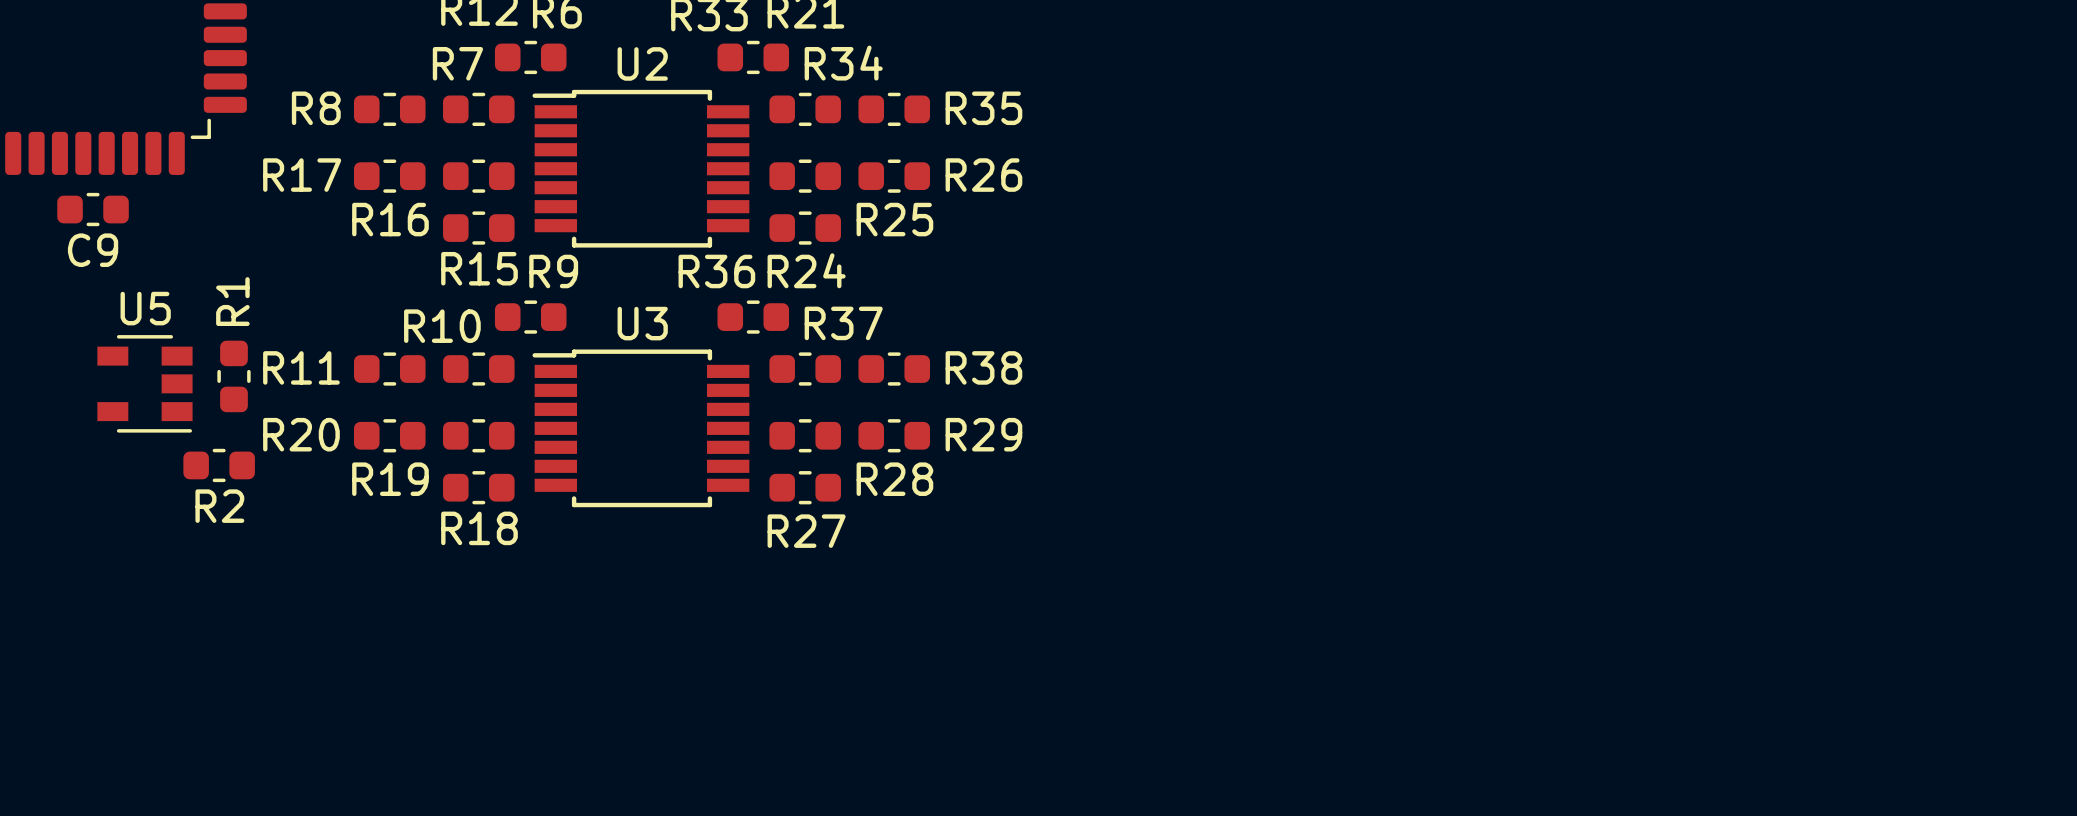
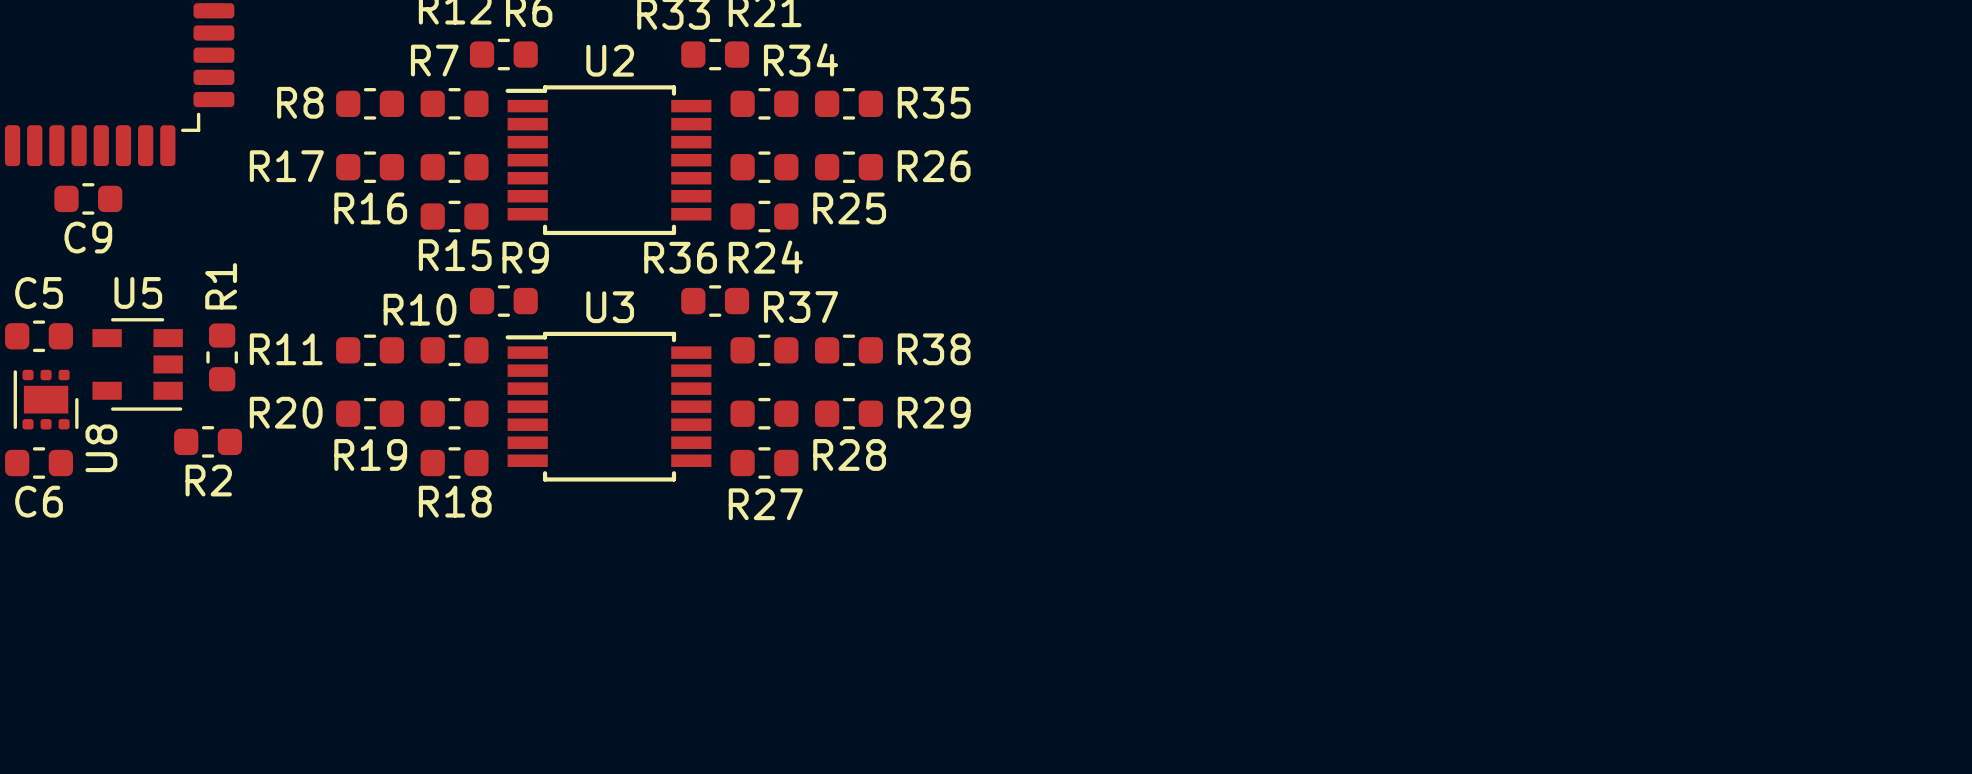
C5: none -> (39, 336)
U8: none -> (46, 399)
C6: none -> (39, 463)

